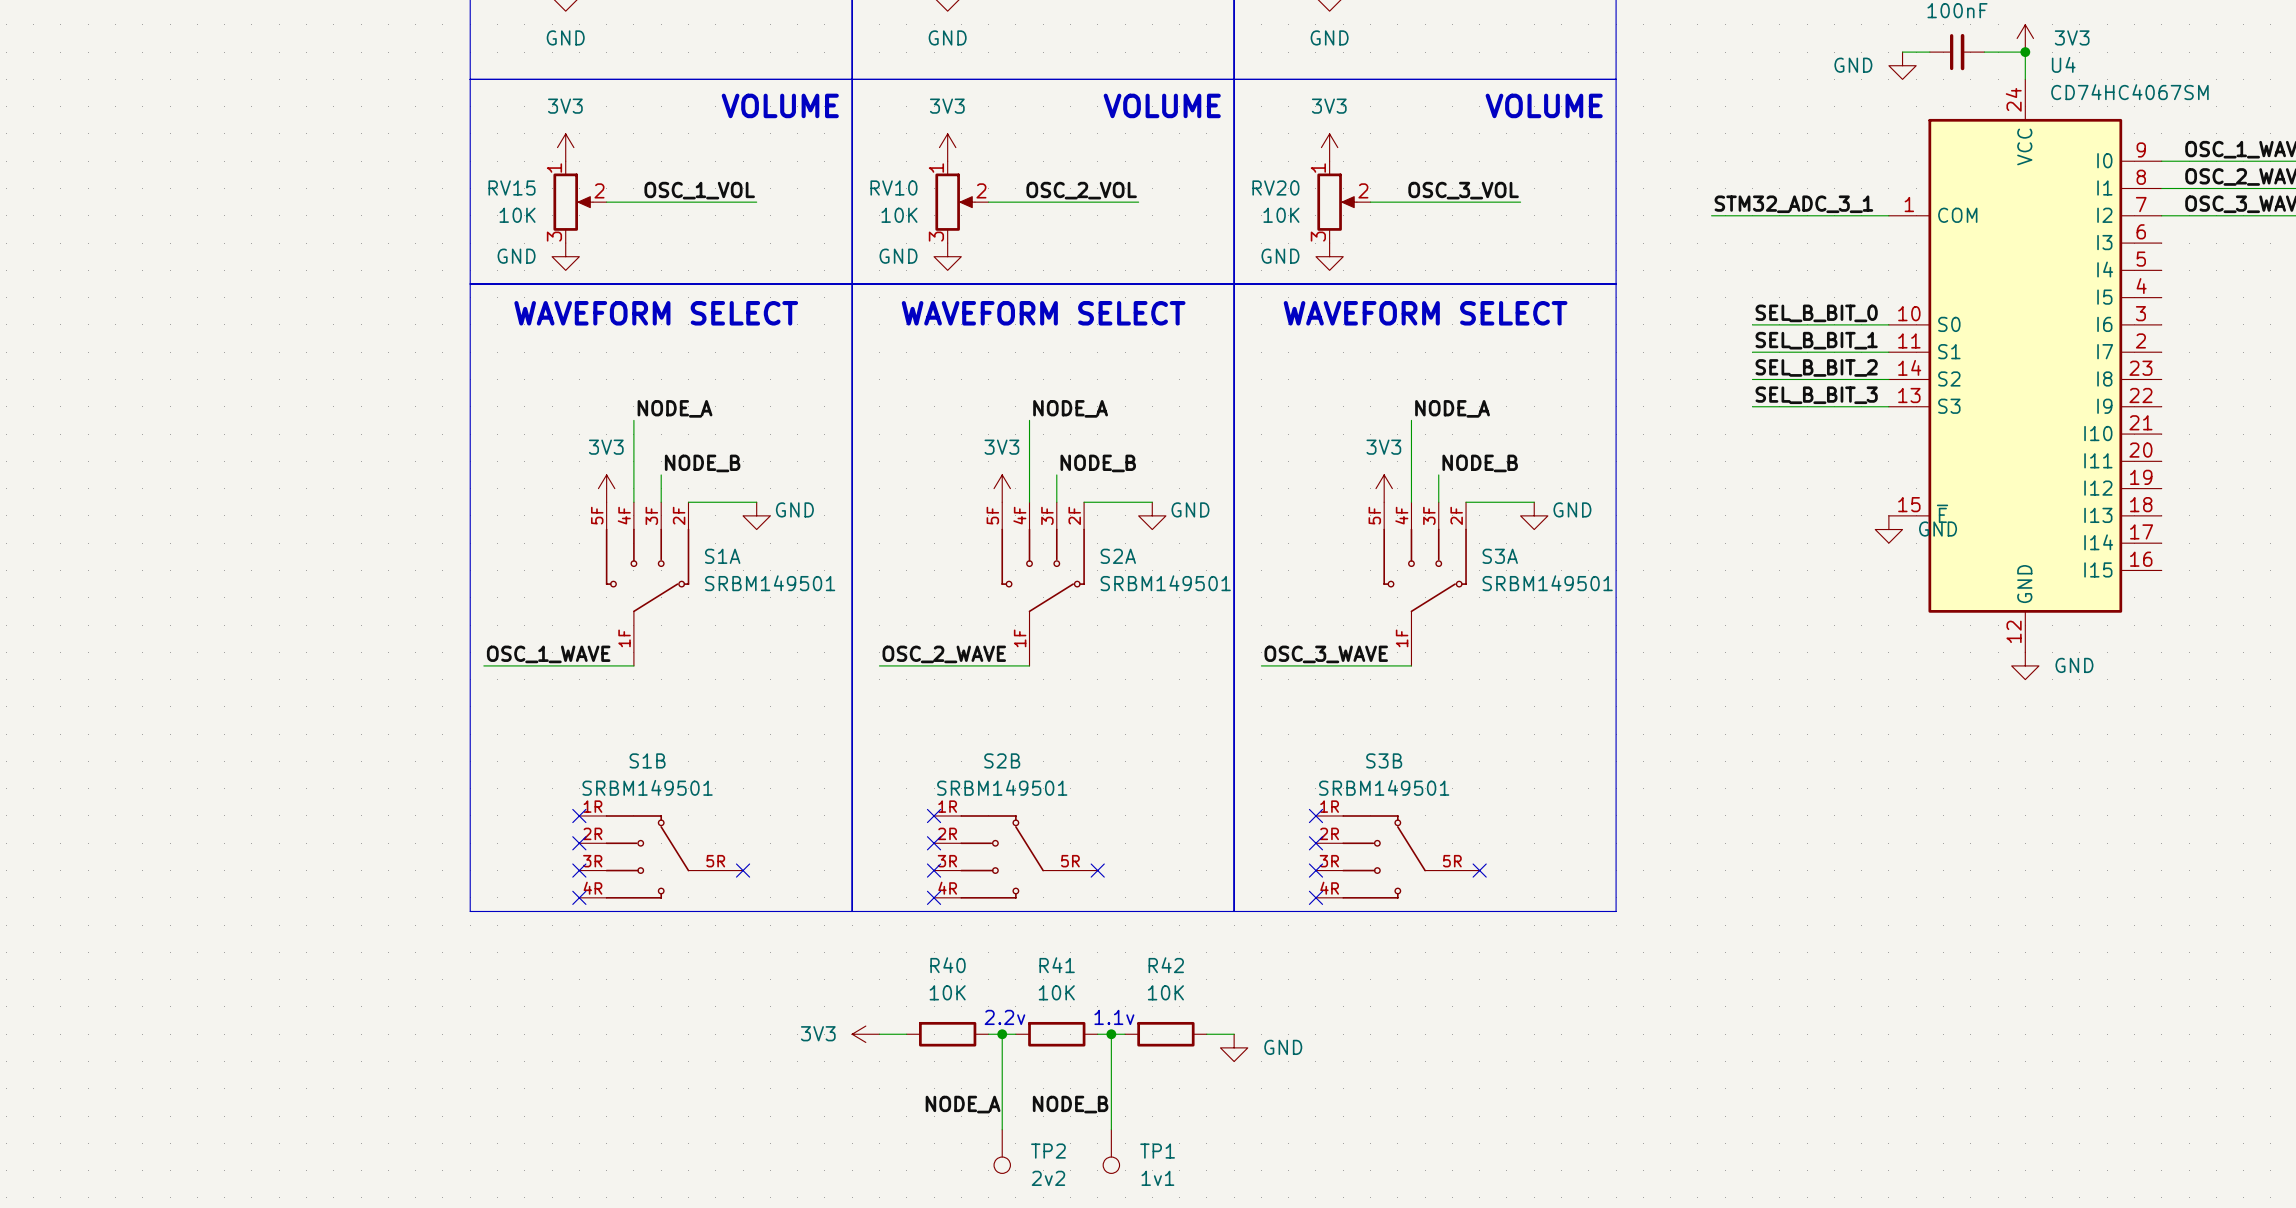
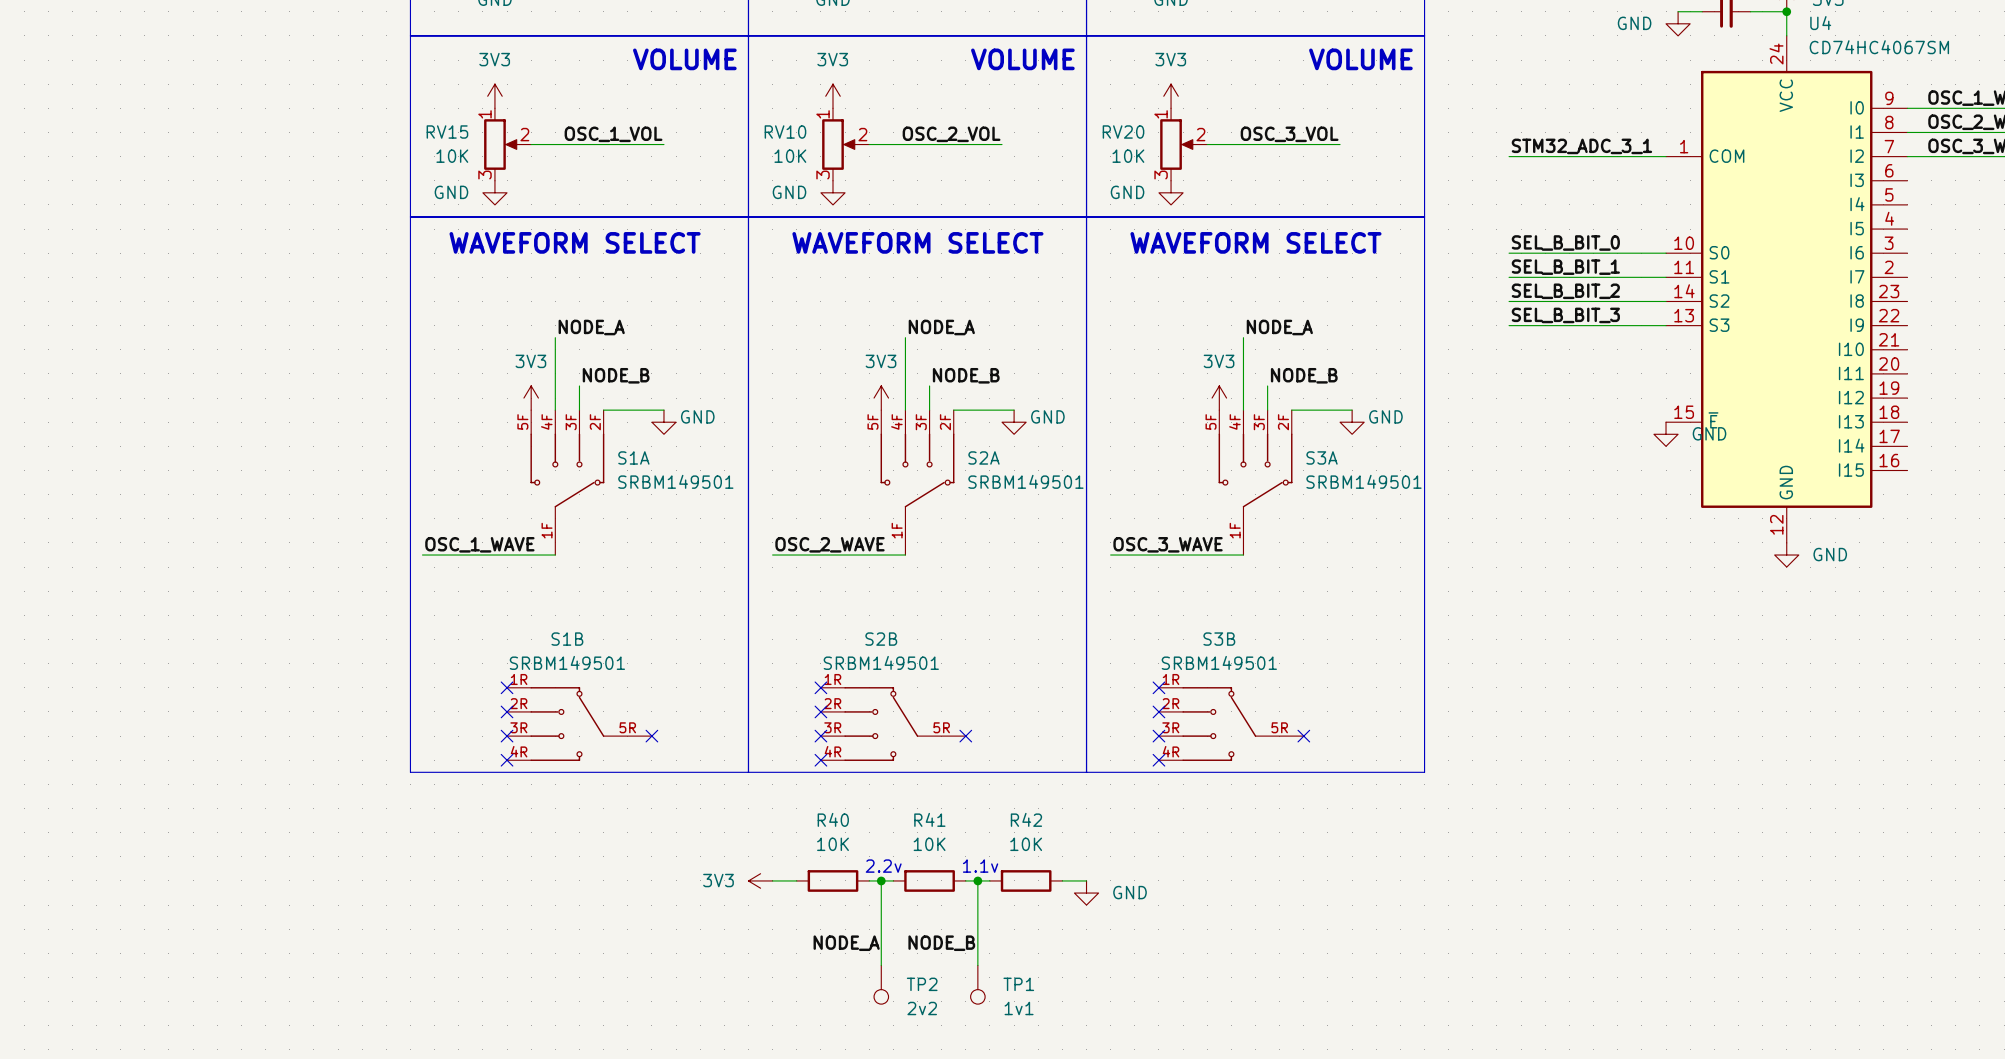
label position: SEL_B_BIT_0 (1816, 313) -> SEL_B_BIT_0 (1565, 242)
wire: none -> (1509, 253) (1545, 253)
label position: SEL_B_BIT_1 (1816, 340) -> SEL_B_BIT_1 (1565, 267)
wire: none -> (1509, 277) (1545, 277)
label position: SEL_B_BIT_2 (1816, 367) -> SEL_B_BIT_2 (1565, 291)
wire: none -> (1509, 301) (1545, 301)
label position: SEL_B_BIT_3 (1816, 395) -> SEL_B_BIT_3 (1565, 315)
wire: none -> (1509, 325) (1545, 325)

